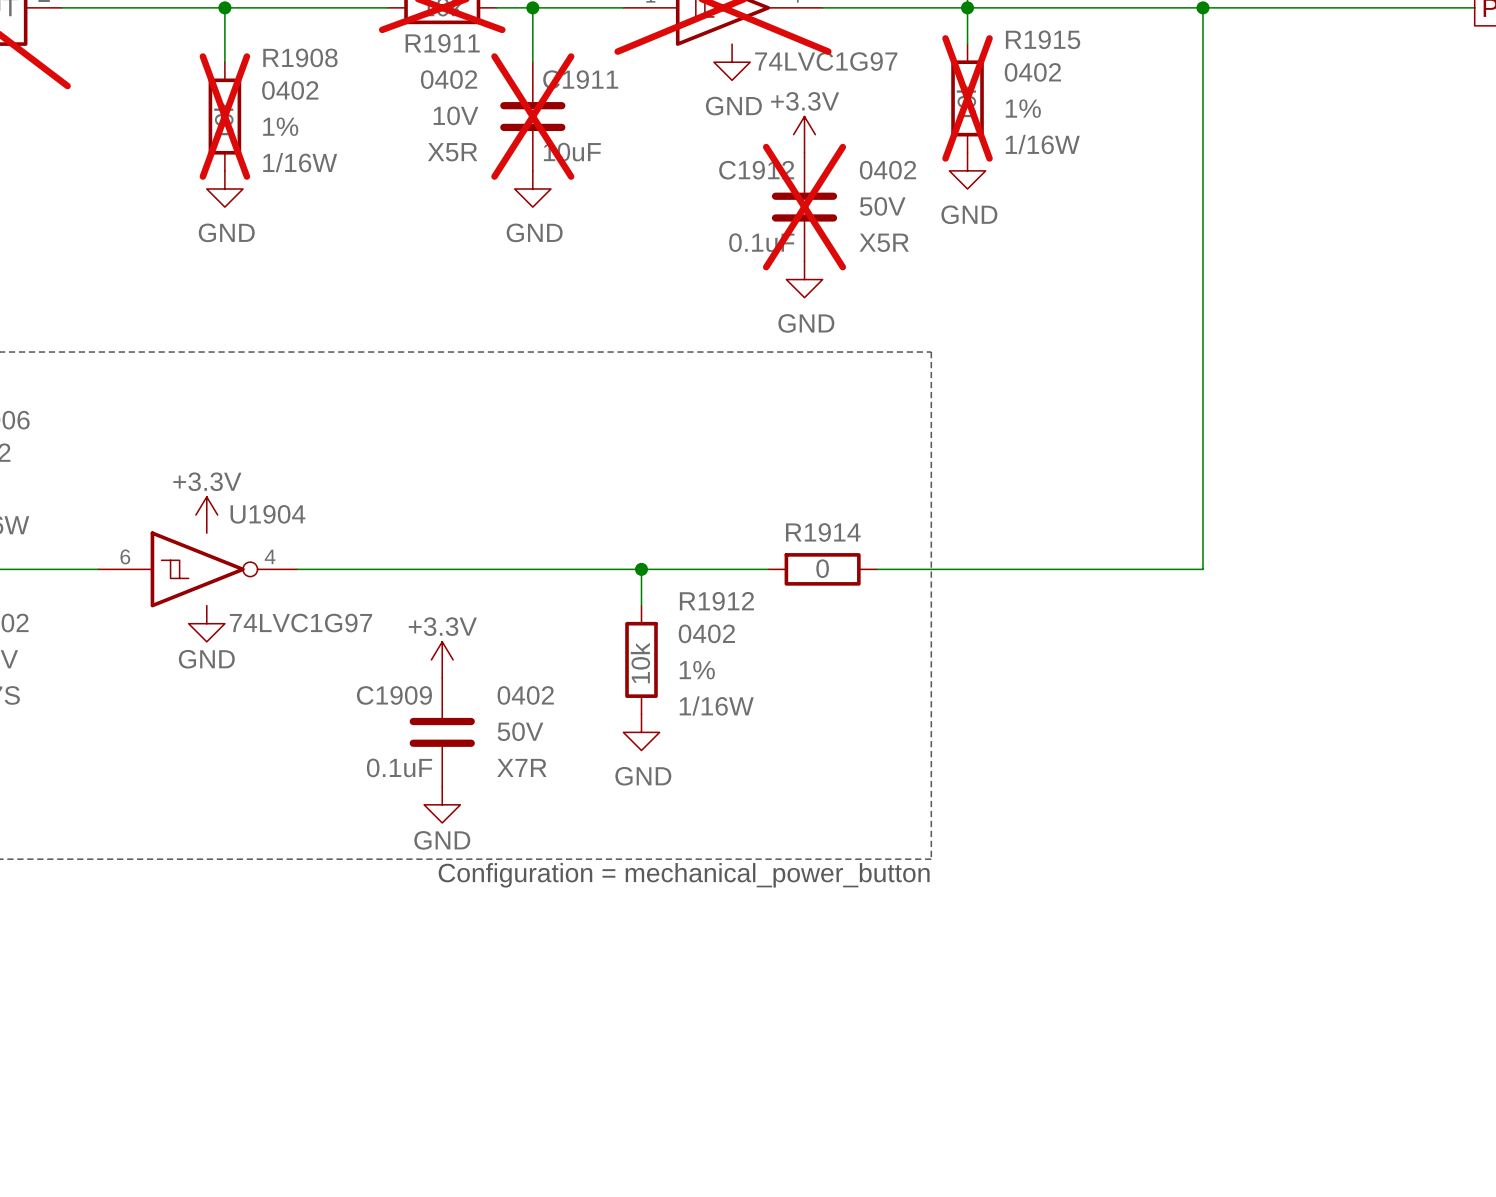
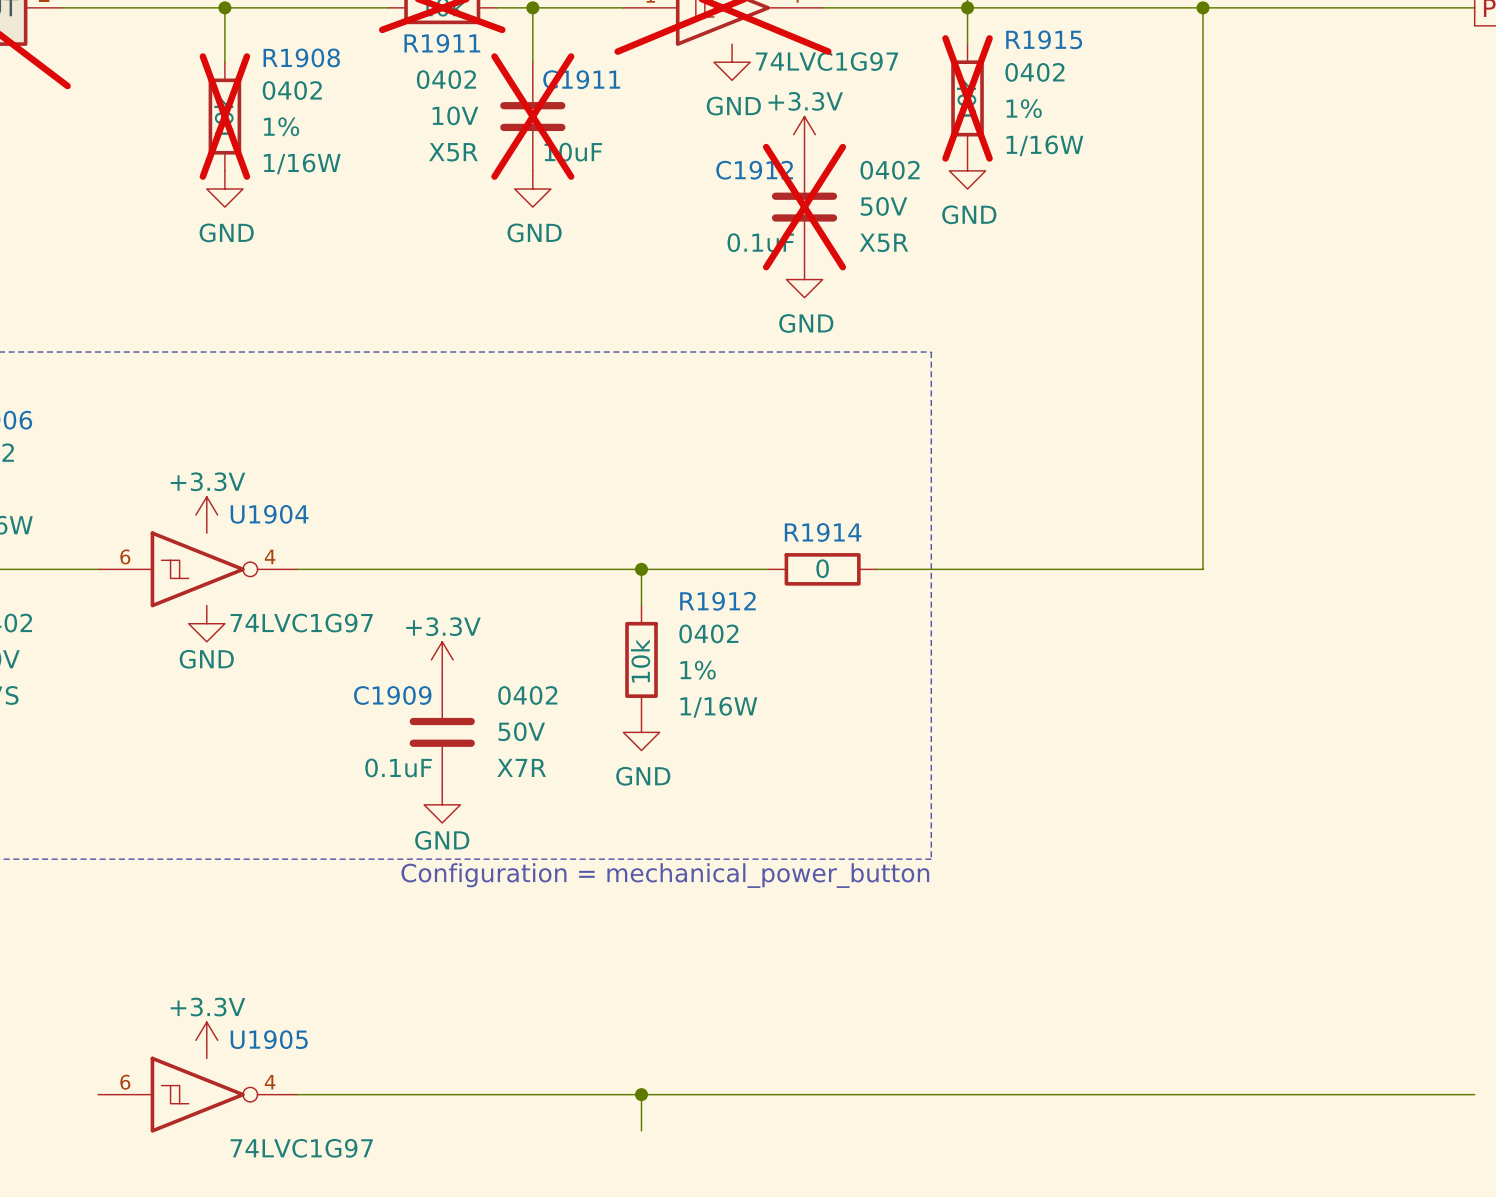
power symbol: none -> +3.3V (206, 1040)
U1905: none -> 74LVC1G97 (197, 1094)
wire: none -> (297, 1094) (1474, 1094)
wire: none -> (641, 1094) (641, 1130)
junction: none -> (641, 1094)

